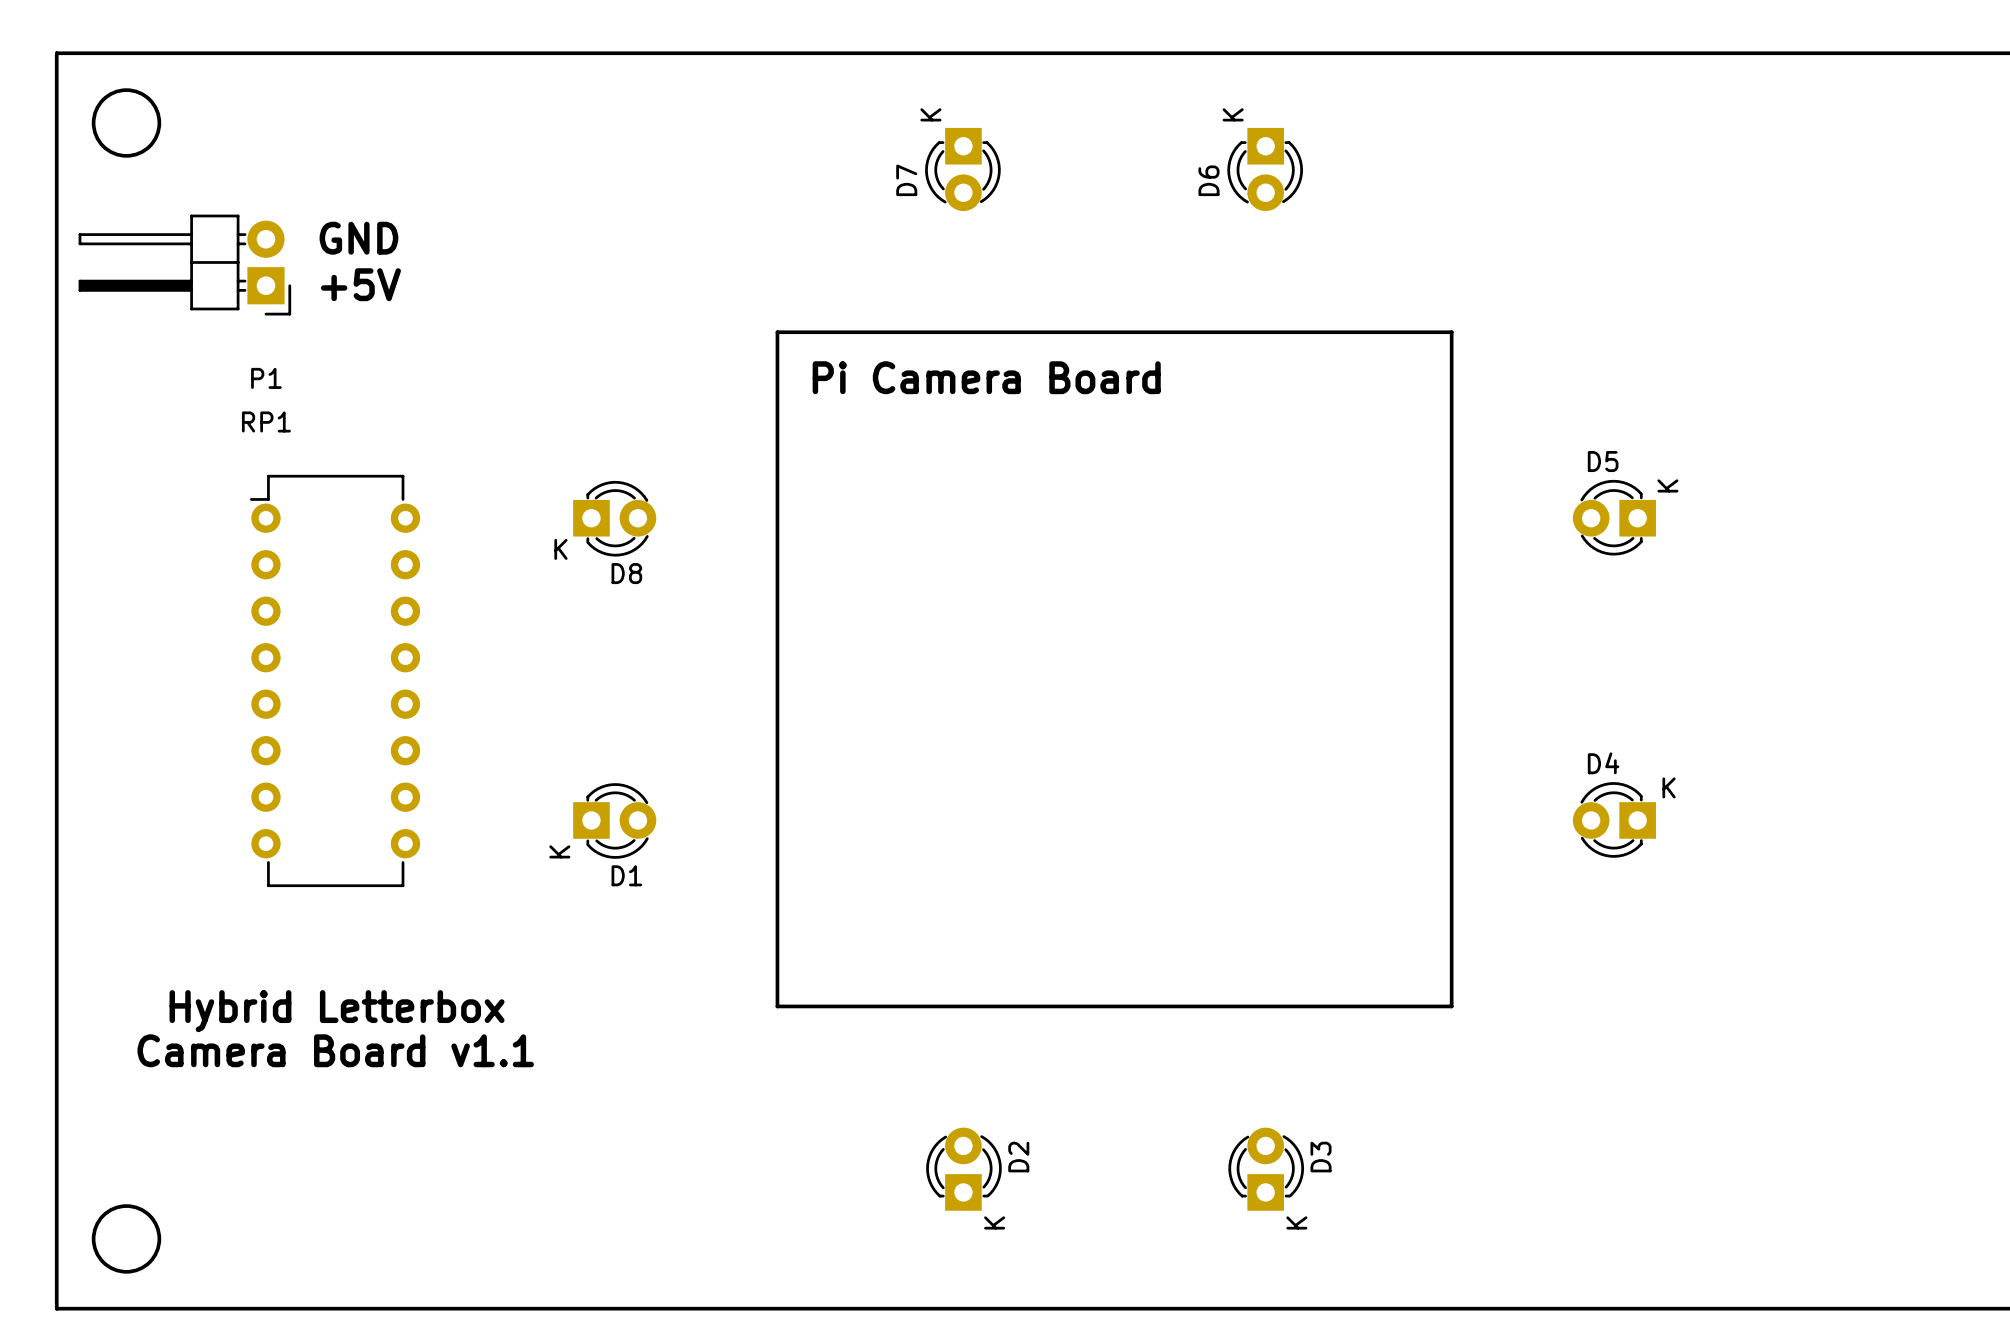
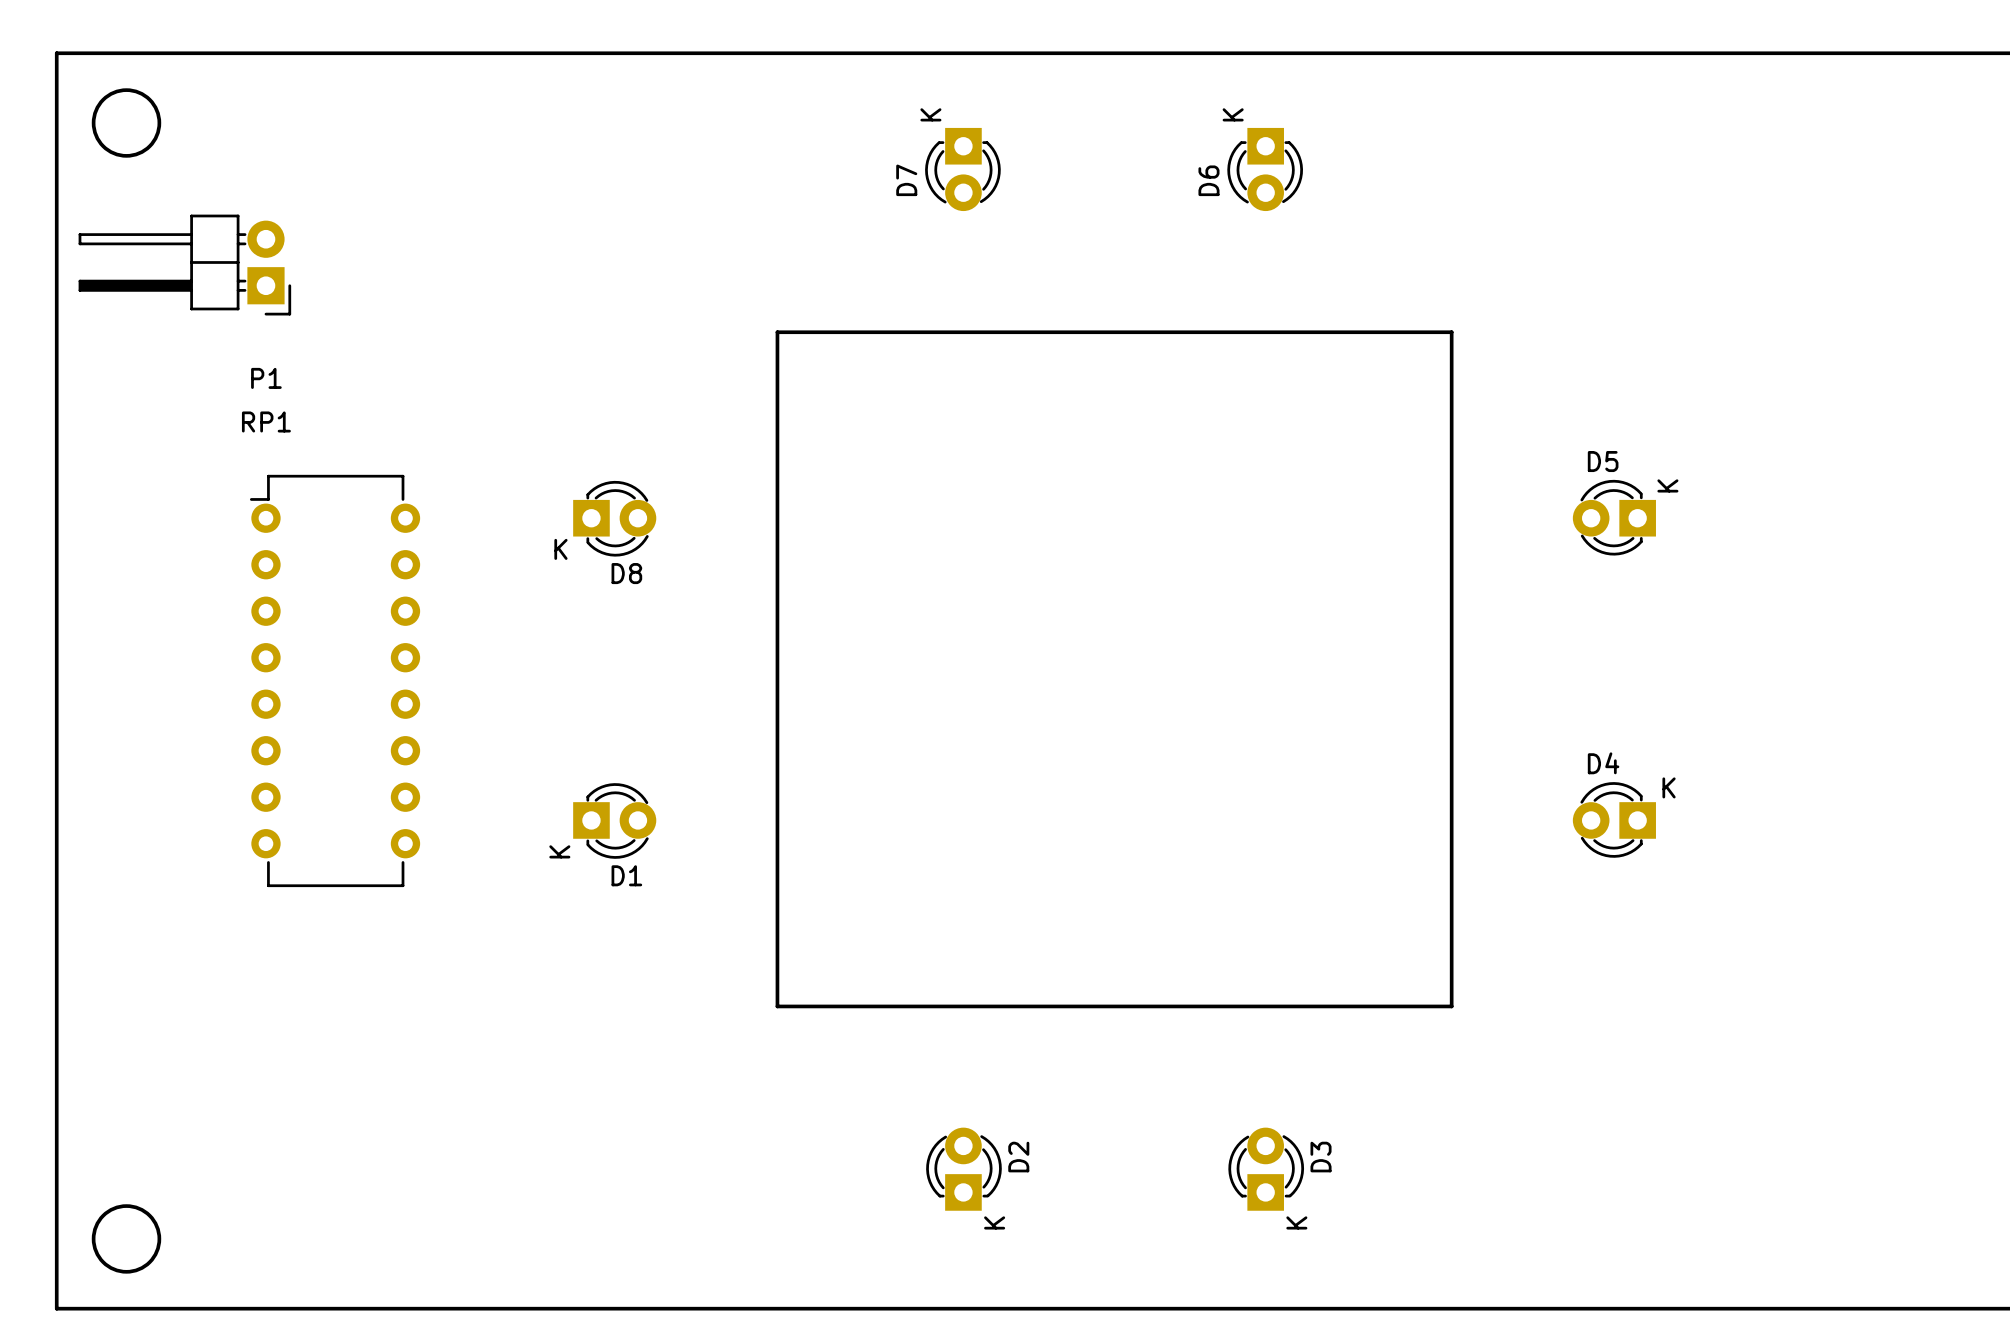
text: GND (358, 238) -> none
text: +5V (360, 284) -> none
text: Pi Camera Board (986, 377) -> none
text: Hybrid Letterbox (337, 1011) -> none
text: Camera Board v1.1 (335, 1050) -> none

